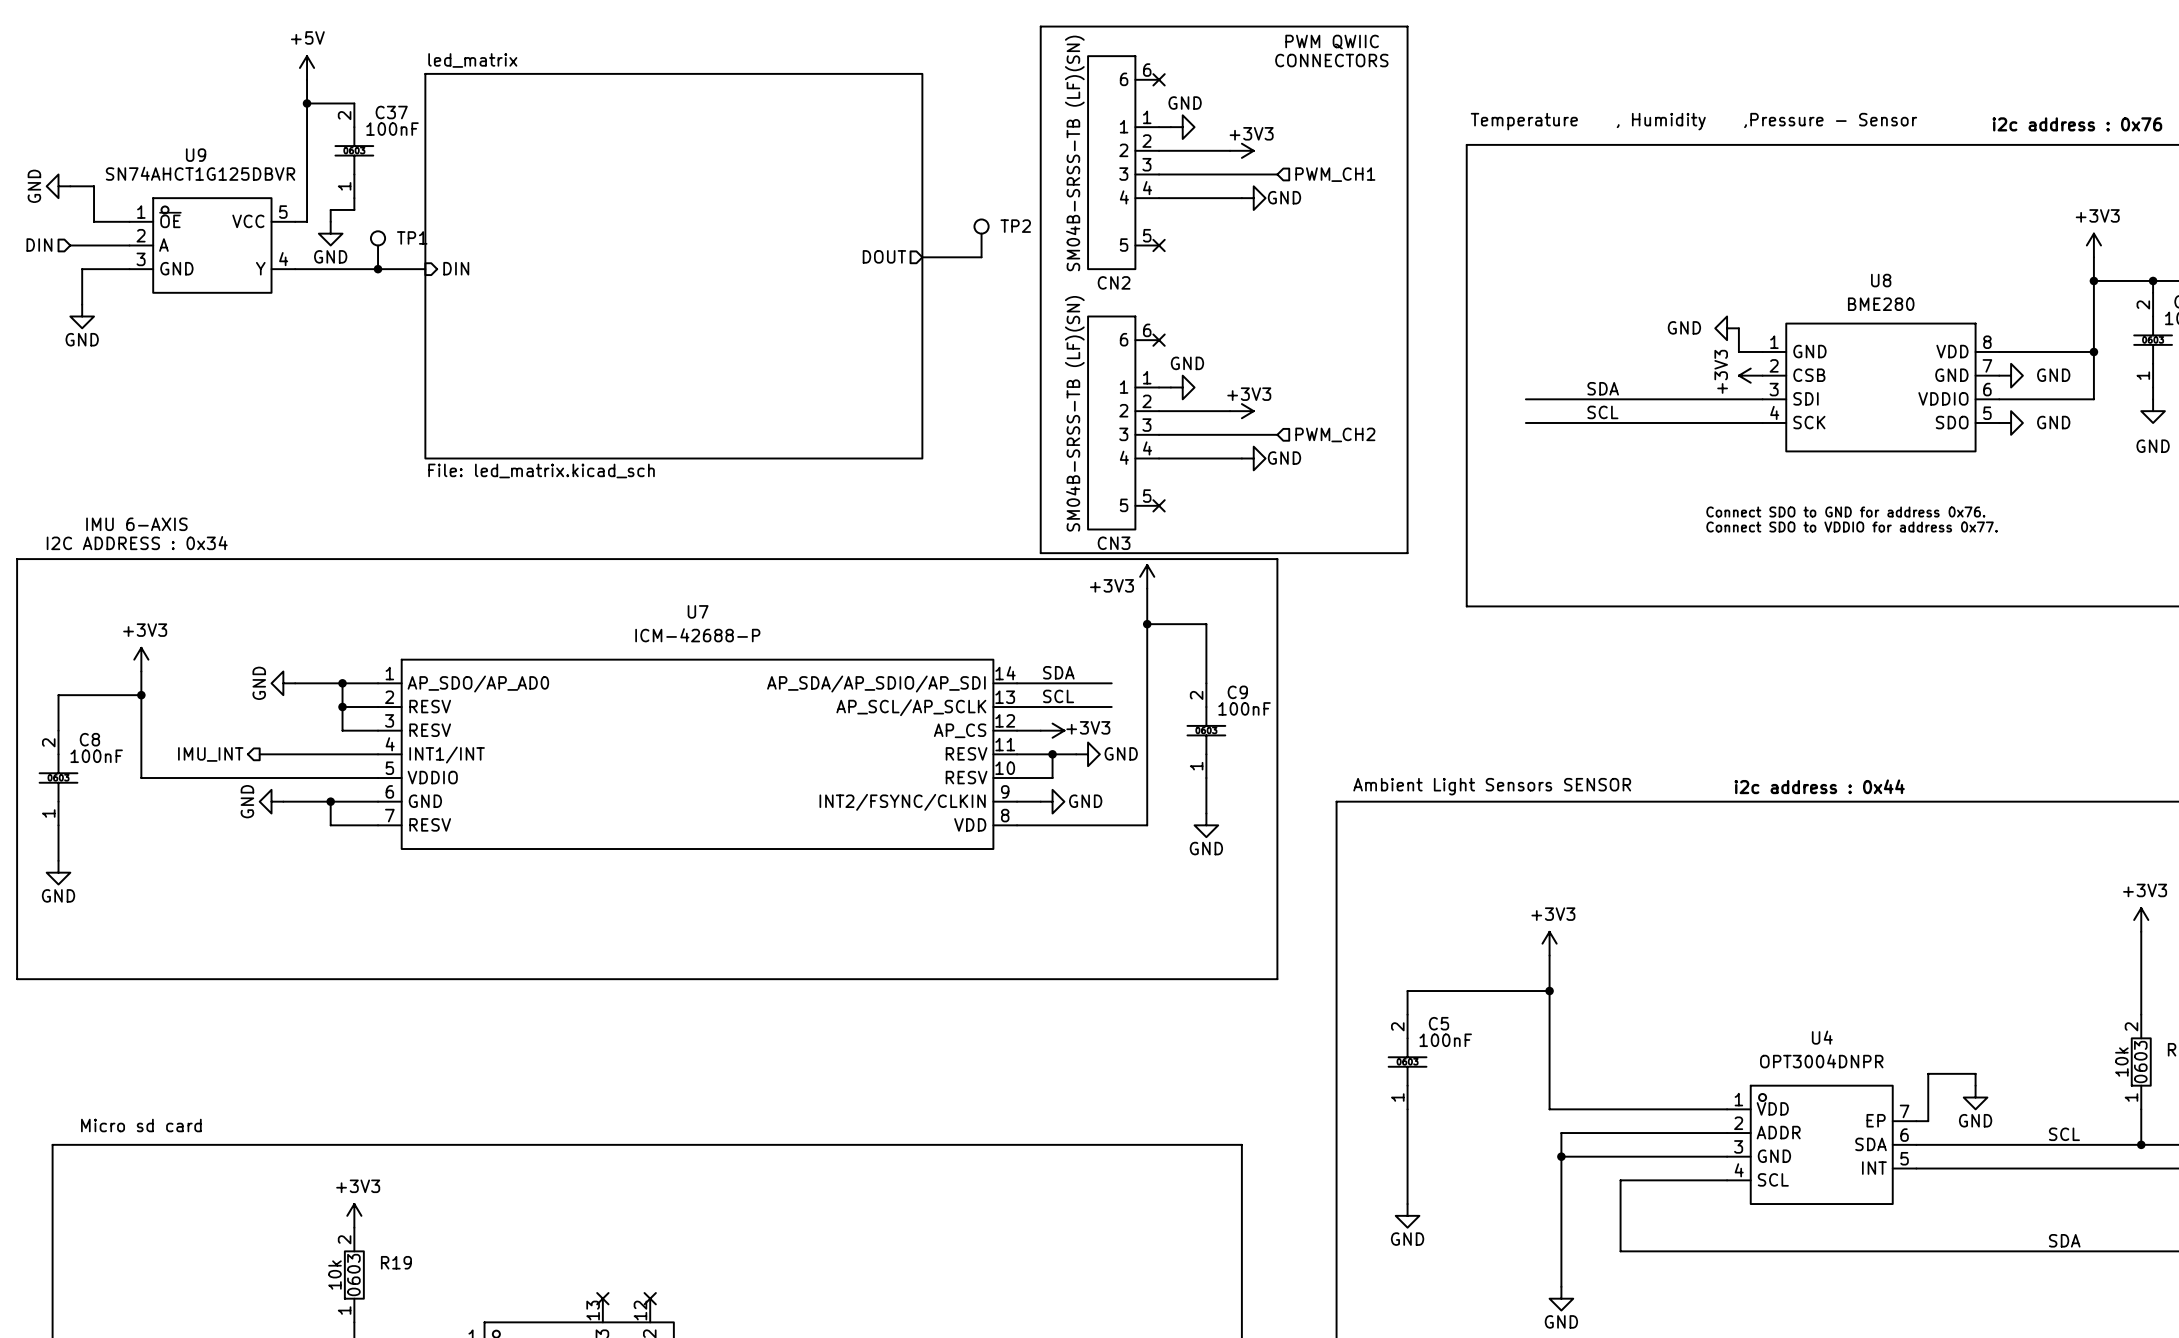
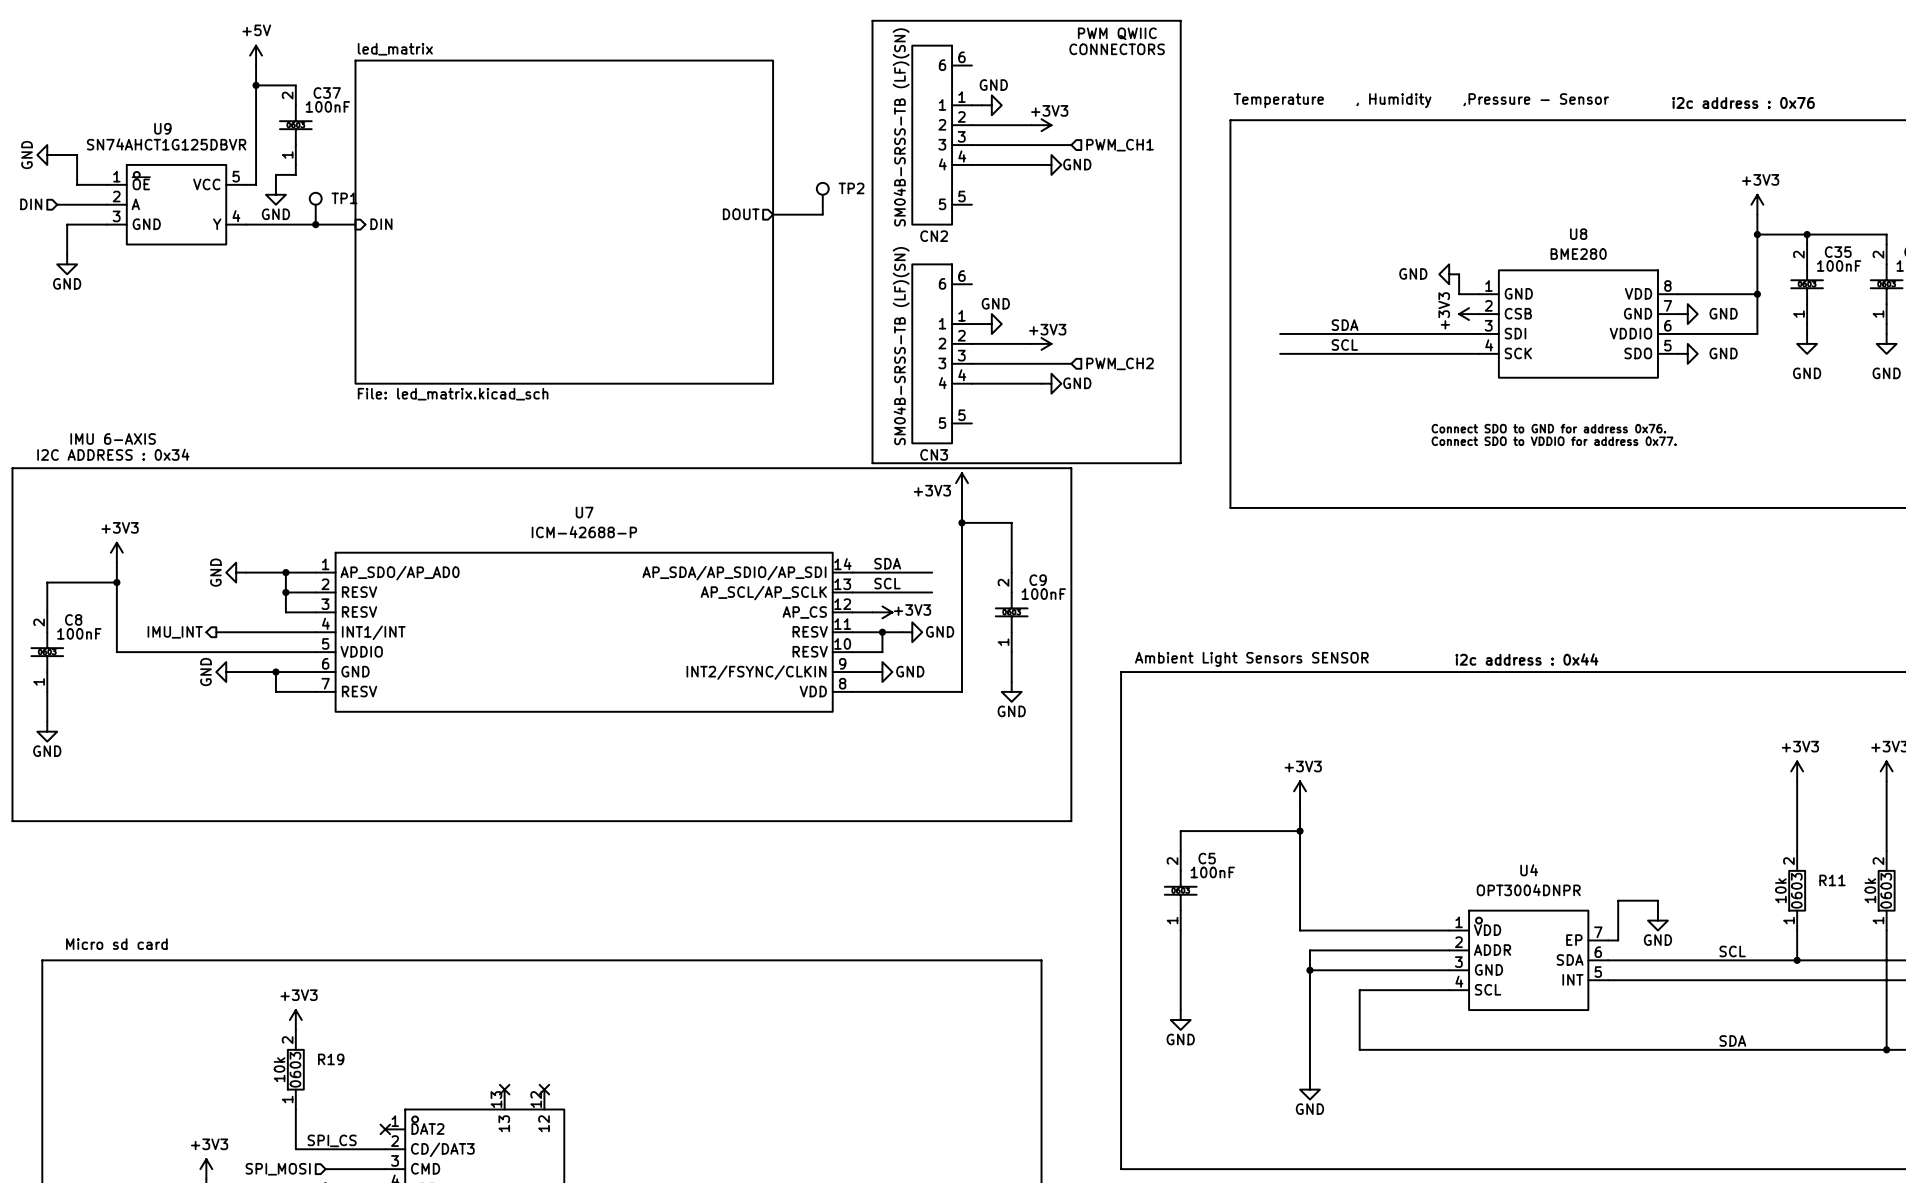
no-connect mark: (1159, 79) -> none
no-connect mark: (1159, 245) -> none
no-connect mark: (1159, 340) -> none
no-connect mark: (1159, 505) -> none

